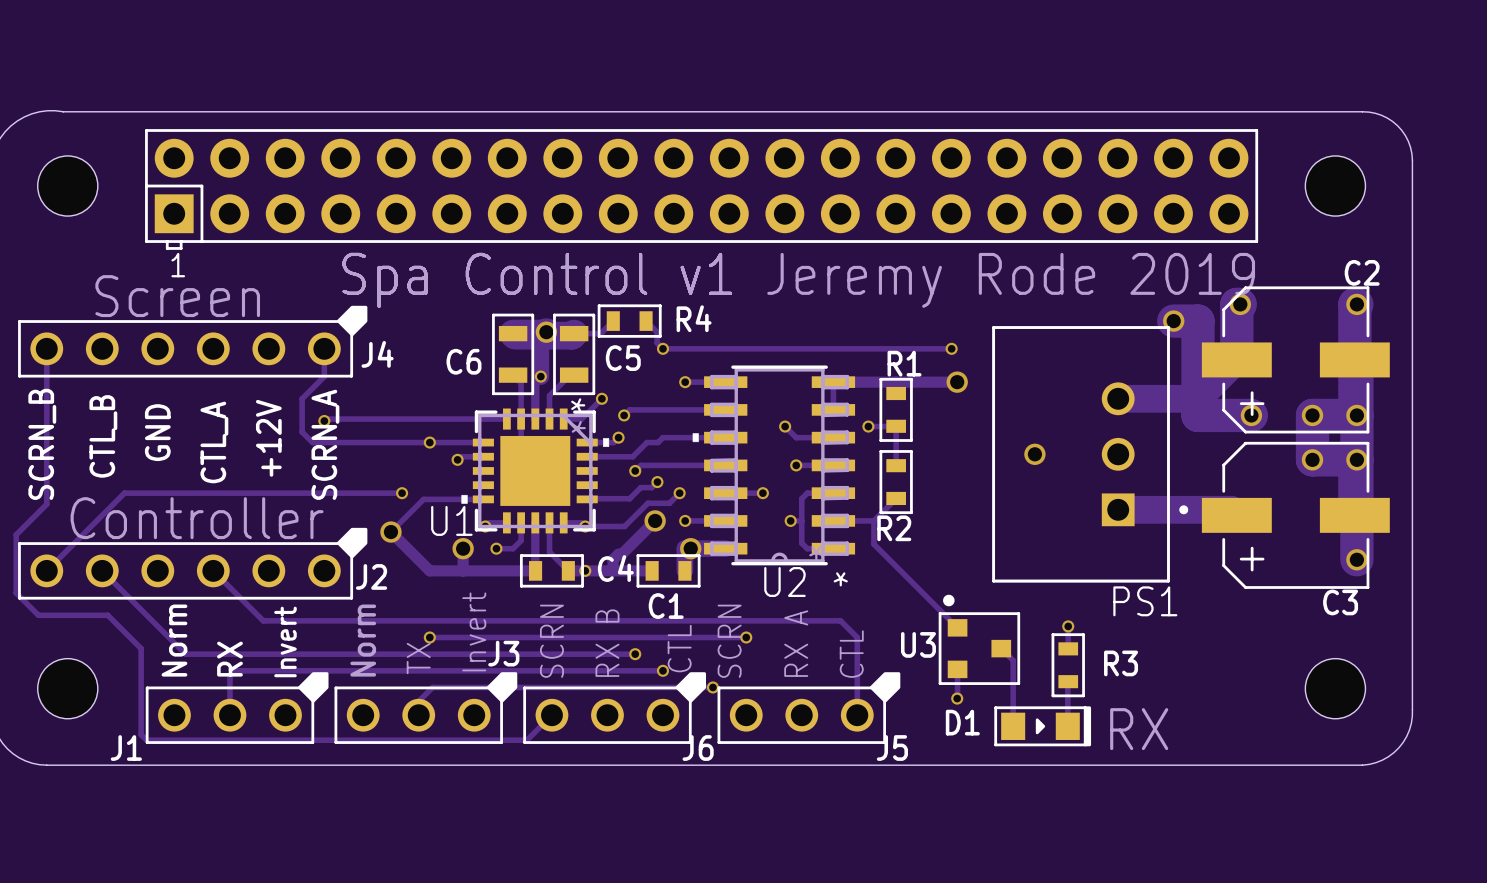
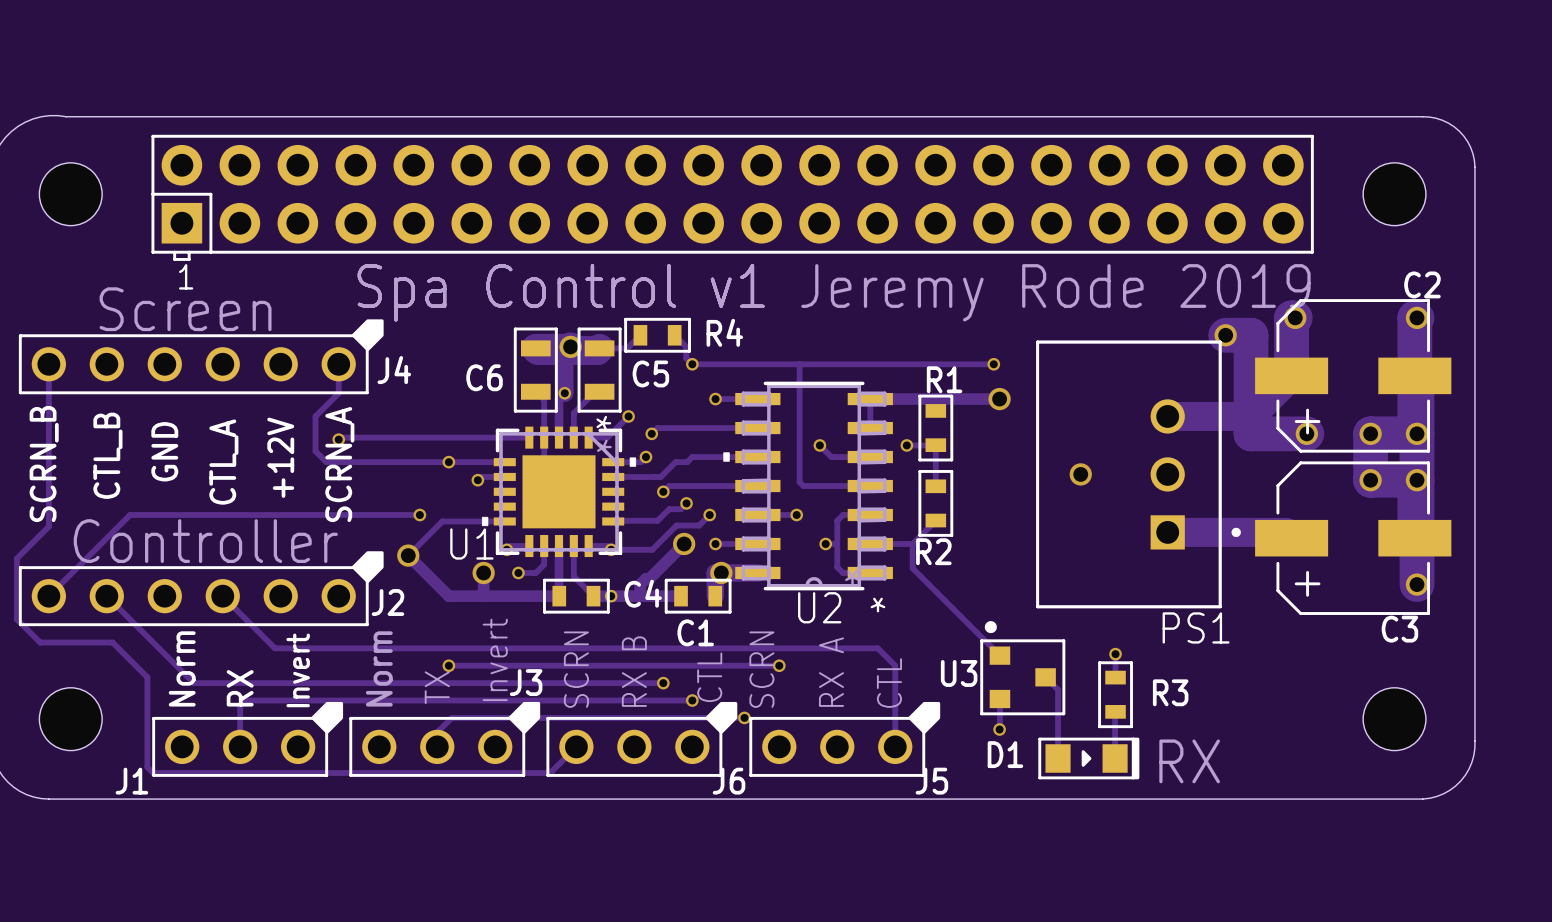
track: none -> (799, 364) (799, 482) (803, 486) (831, 486)
via: (796, 465) -> none

